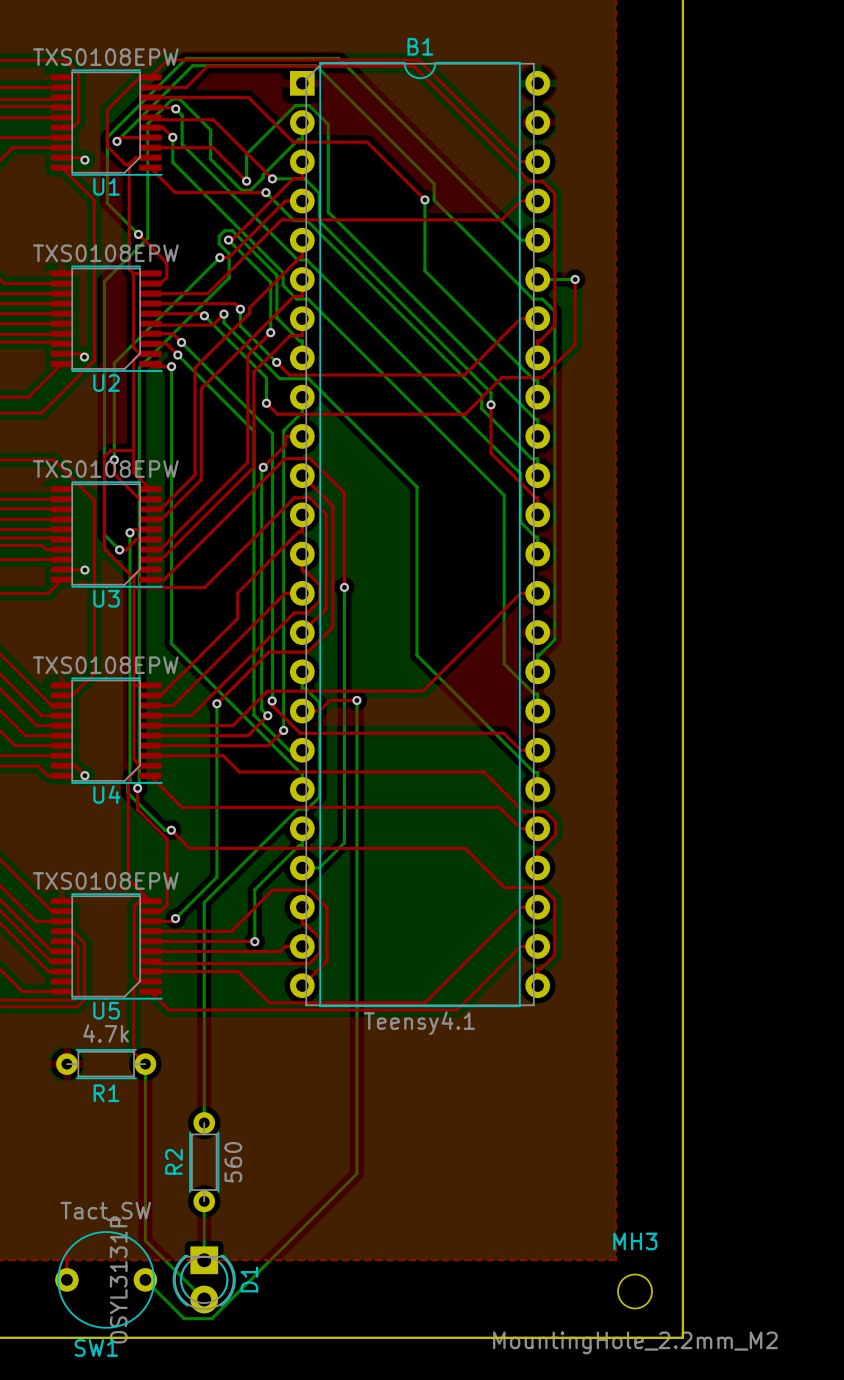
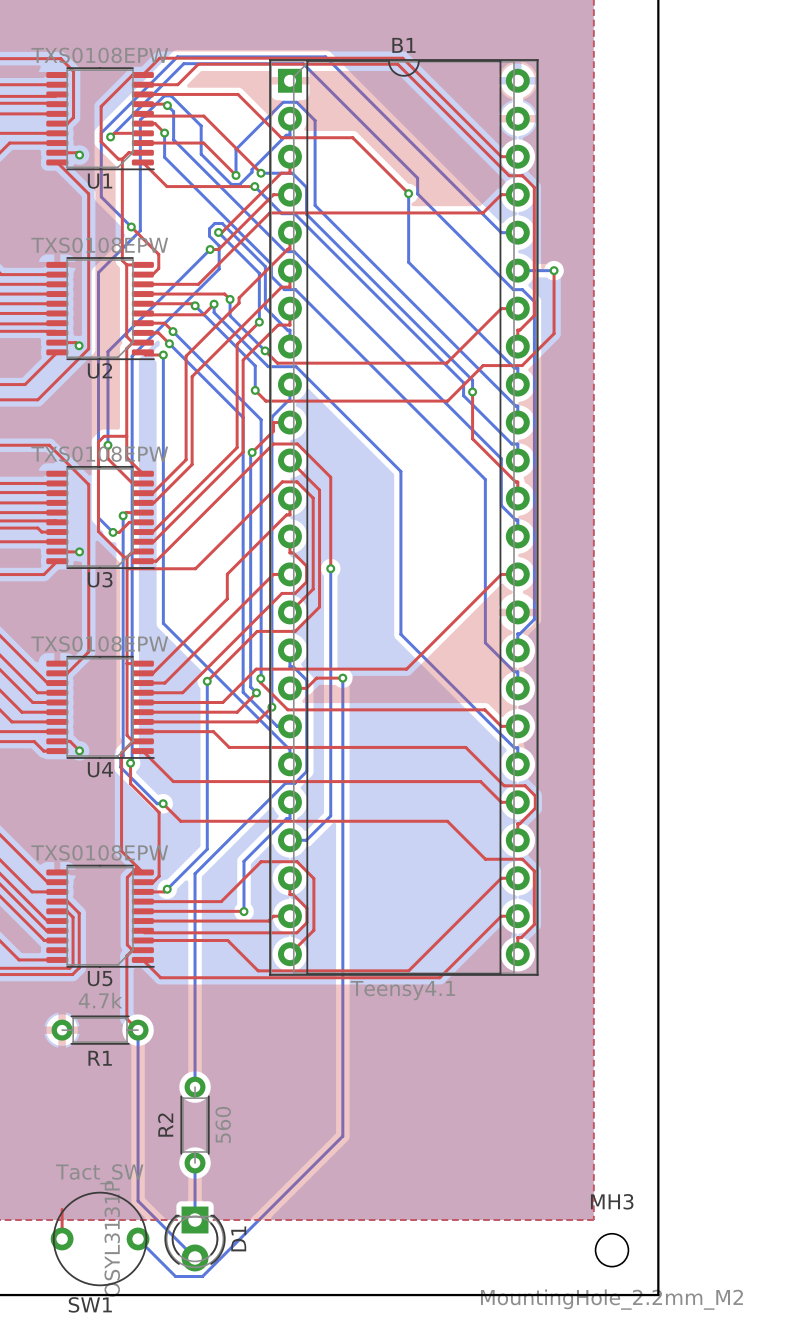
B1 footprint: [289, 61, 551, 1008] -> [269, 59, 539, 976]

